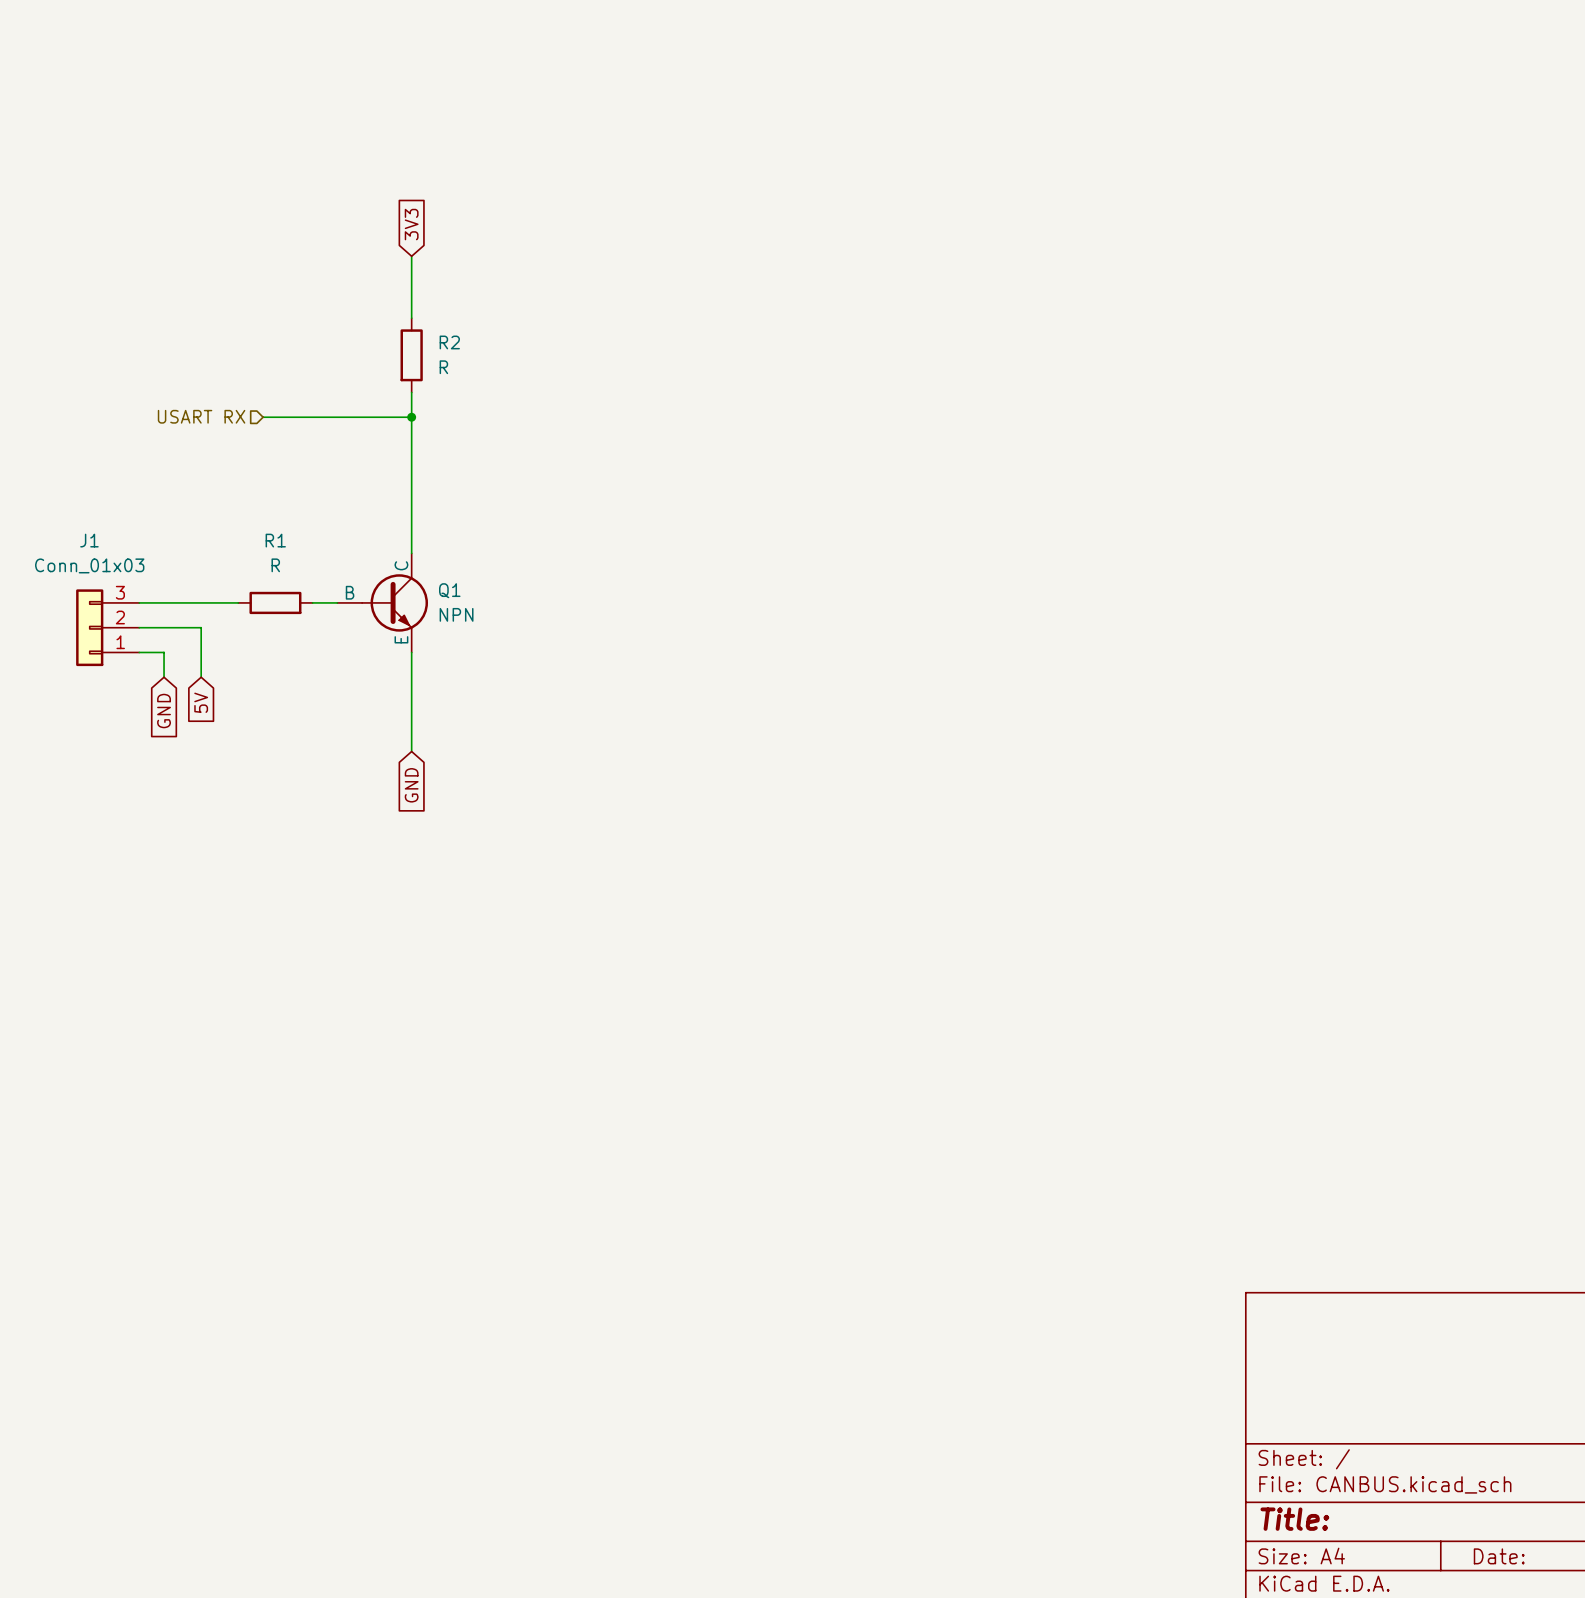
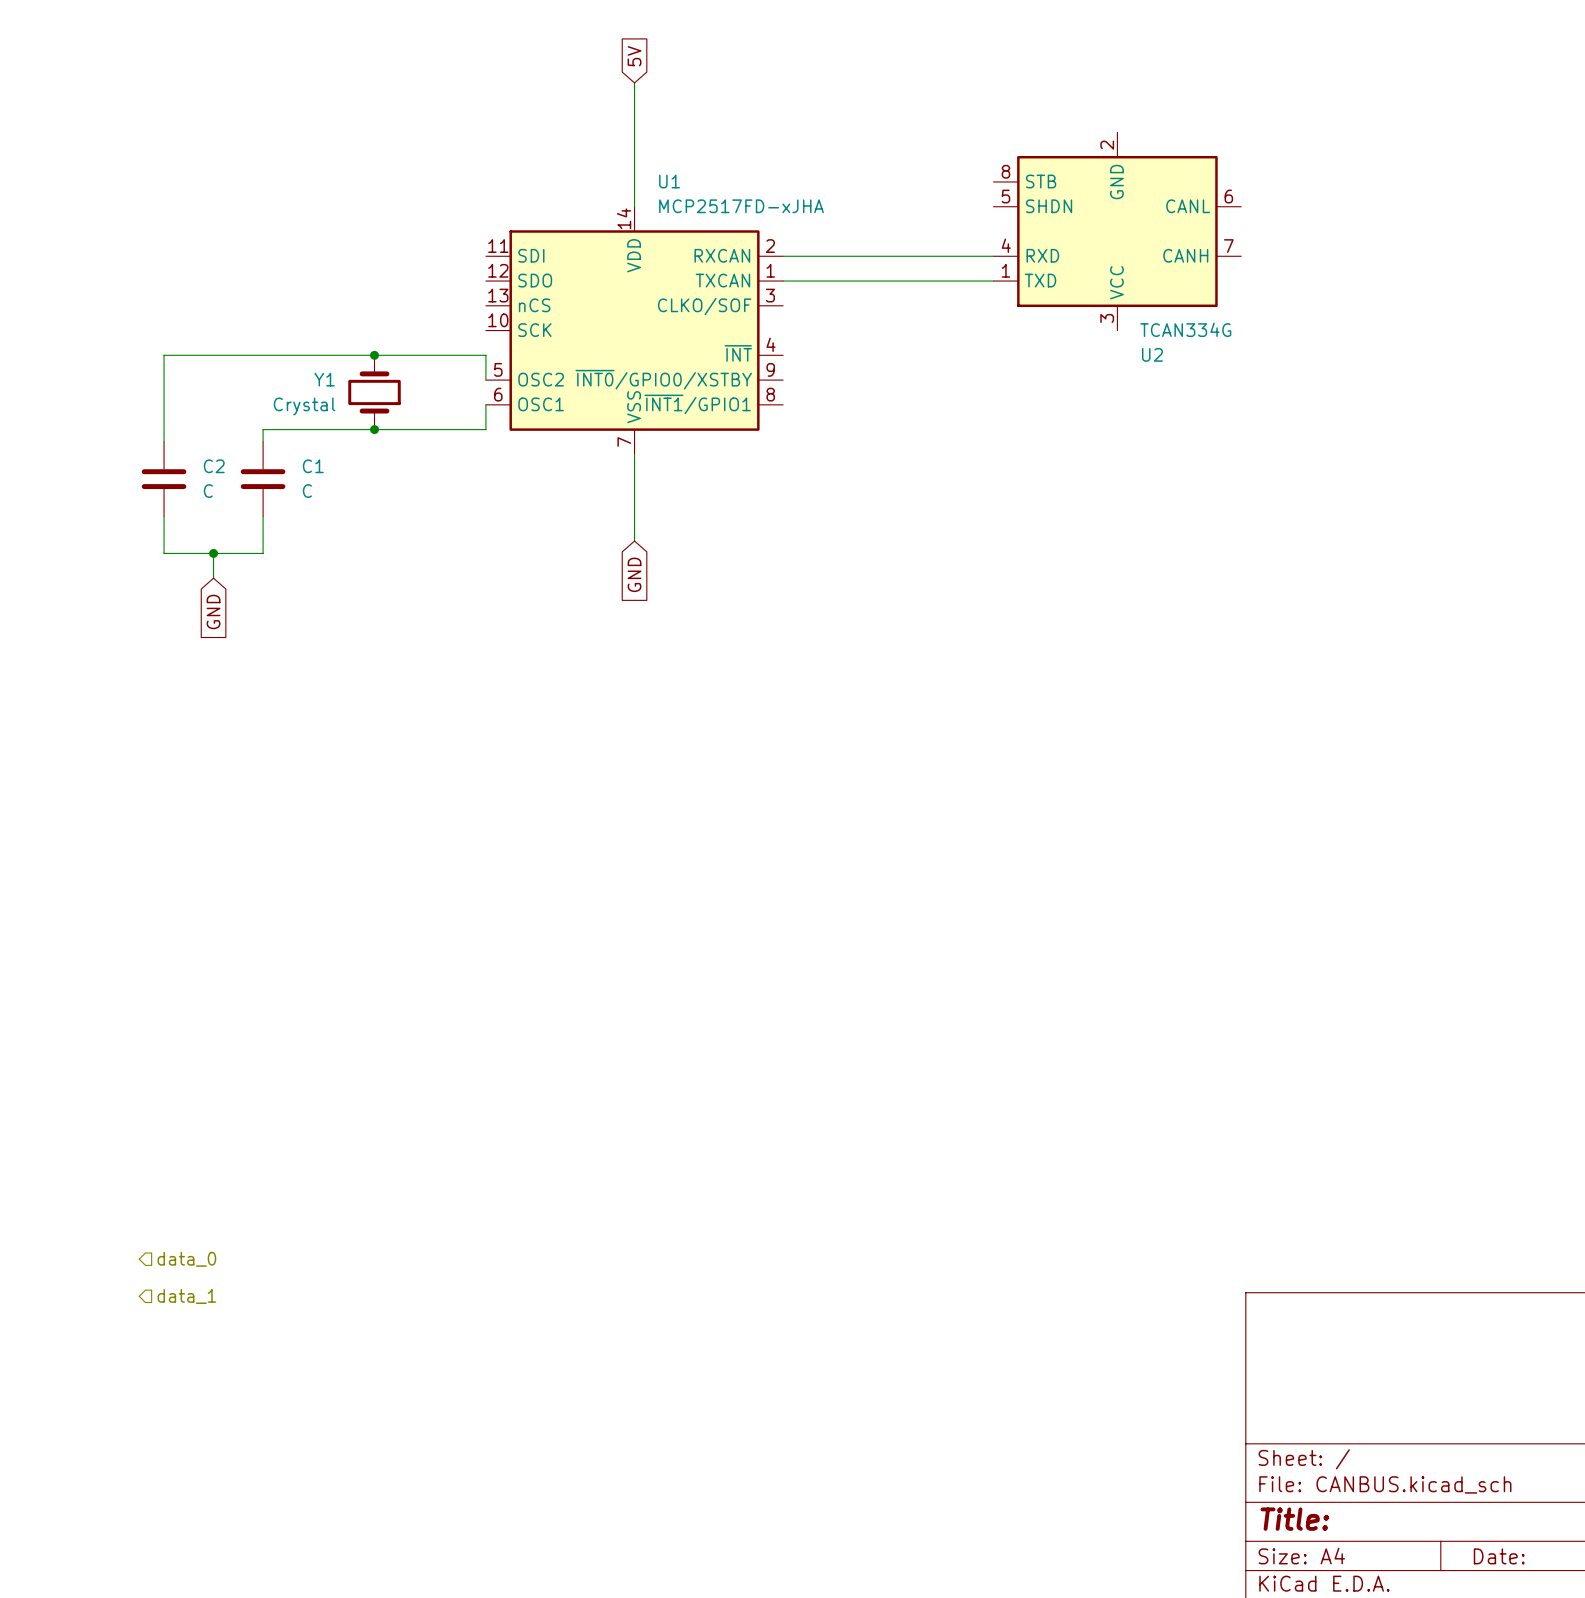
global label: none -> 5V (634, 56)
wire: none -> (634, 82) (634, 206)
global label: 3V3 (411, 224) -> none
U2: none -> TCAN334G (1117, 231)
wire: (411, 256) (411, 318) -> none
wire: none -> (783, 256) (993, 256)
wire: none -> (783, 281) (993, 281)
U1: none -> MCP2517FD-xJHA (634, 330)
junction: none -> (374, 355)
R2: R (411, 355) -> none
wire: none -> (485, 380) (485, 355) (164, 355) (164, 441)
Y1: none -> Crystal (374, 392)
wire: (411, 392) (411, 553) -> none
wire: none -> (485, 404) (485, 429) (263, 429) (263, 441)
hierarchical label: USART RX (201, 416) -> none
wire: (263, 417) (411, 417) -> none
junction: (411, 417) -> none
junction: none -> (374, 429)
wire: none -> (634, 454) (634, 541)
C2: none -> C (164, 479)
C1: none -> C (263, 479)
wire: none -> (164, 516) (164, 553) (263, 553) (263, 516)
wire: none -> (213, 553) (213, 578)
junction: none -> (213, 553)
global label: none -> GND (634, 574)
wire: (139, 602) (238, 602) -> none
R1: R (275, 602) -> none
wire: (312, 602) (337, 602) -> none
Q1: NPN (382, 602) -> none
J1: Conn_01x03 (107, 627) -> none
wire: (139, 627) (201, 627) (201, 677) -> none
wire: (139, 652) (164, 652) (164, 677) -> none
wire: (411, 652) (411, 751) -> none
global label: 5V (201, 702) -> none
global label position: GND (164, 711) -> GND (213, 611)
global label: GND (411, 785) -> none
hierarchical label: none -> data_0 (186, 1259)
hierarchical label: none -> data_1 (186, 1296)

